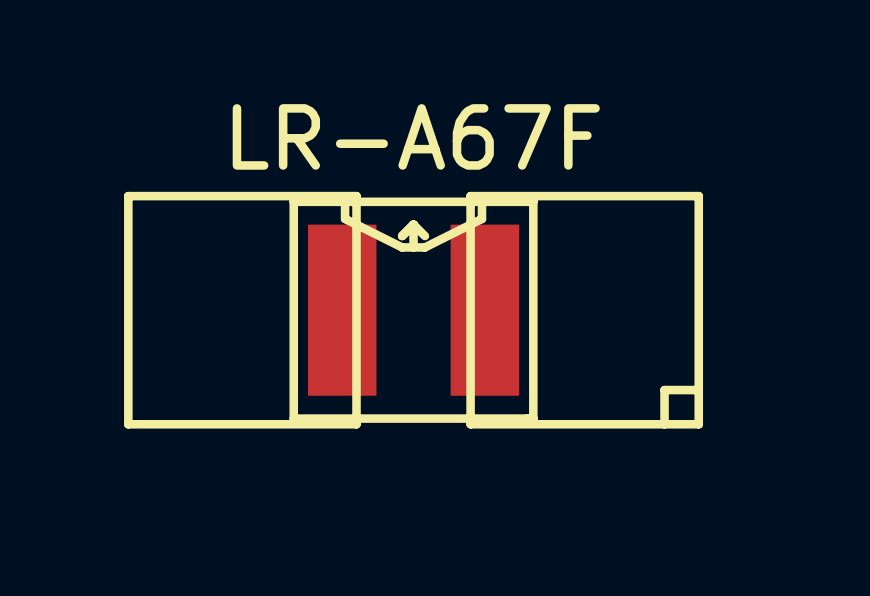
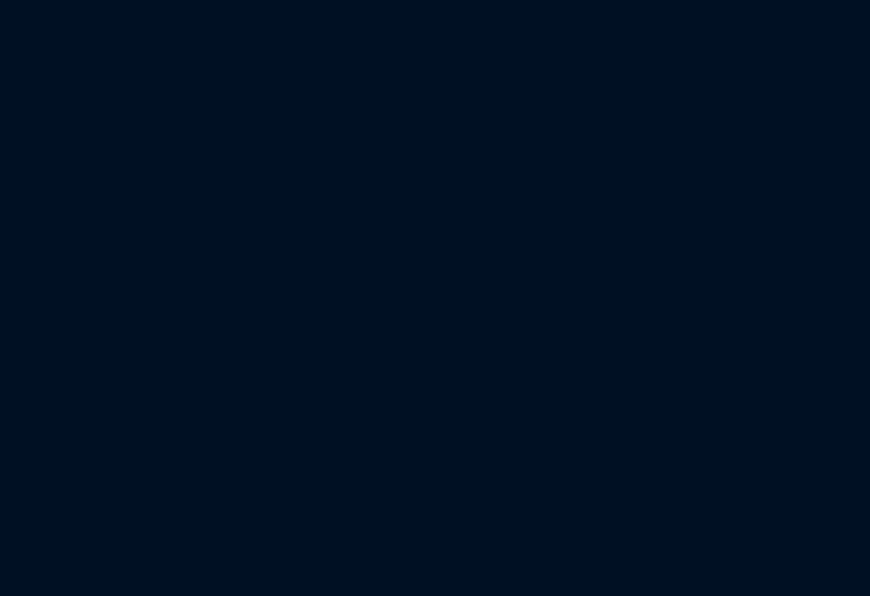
part: LR-A67F (413, 310) -> none

